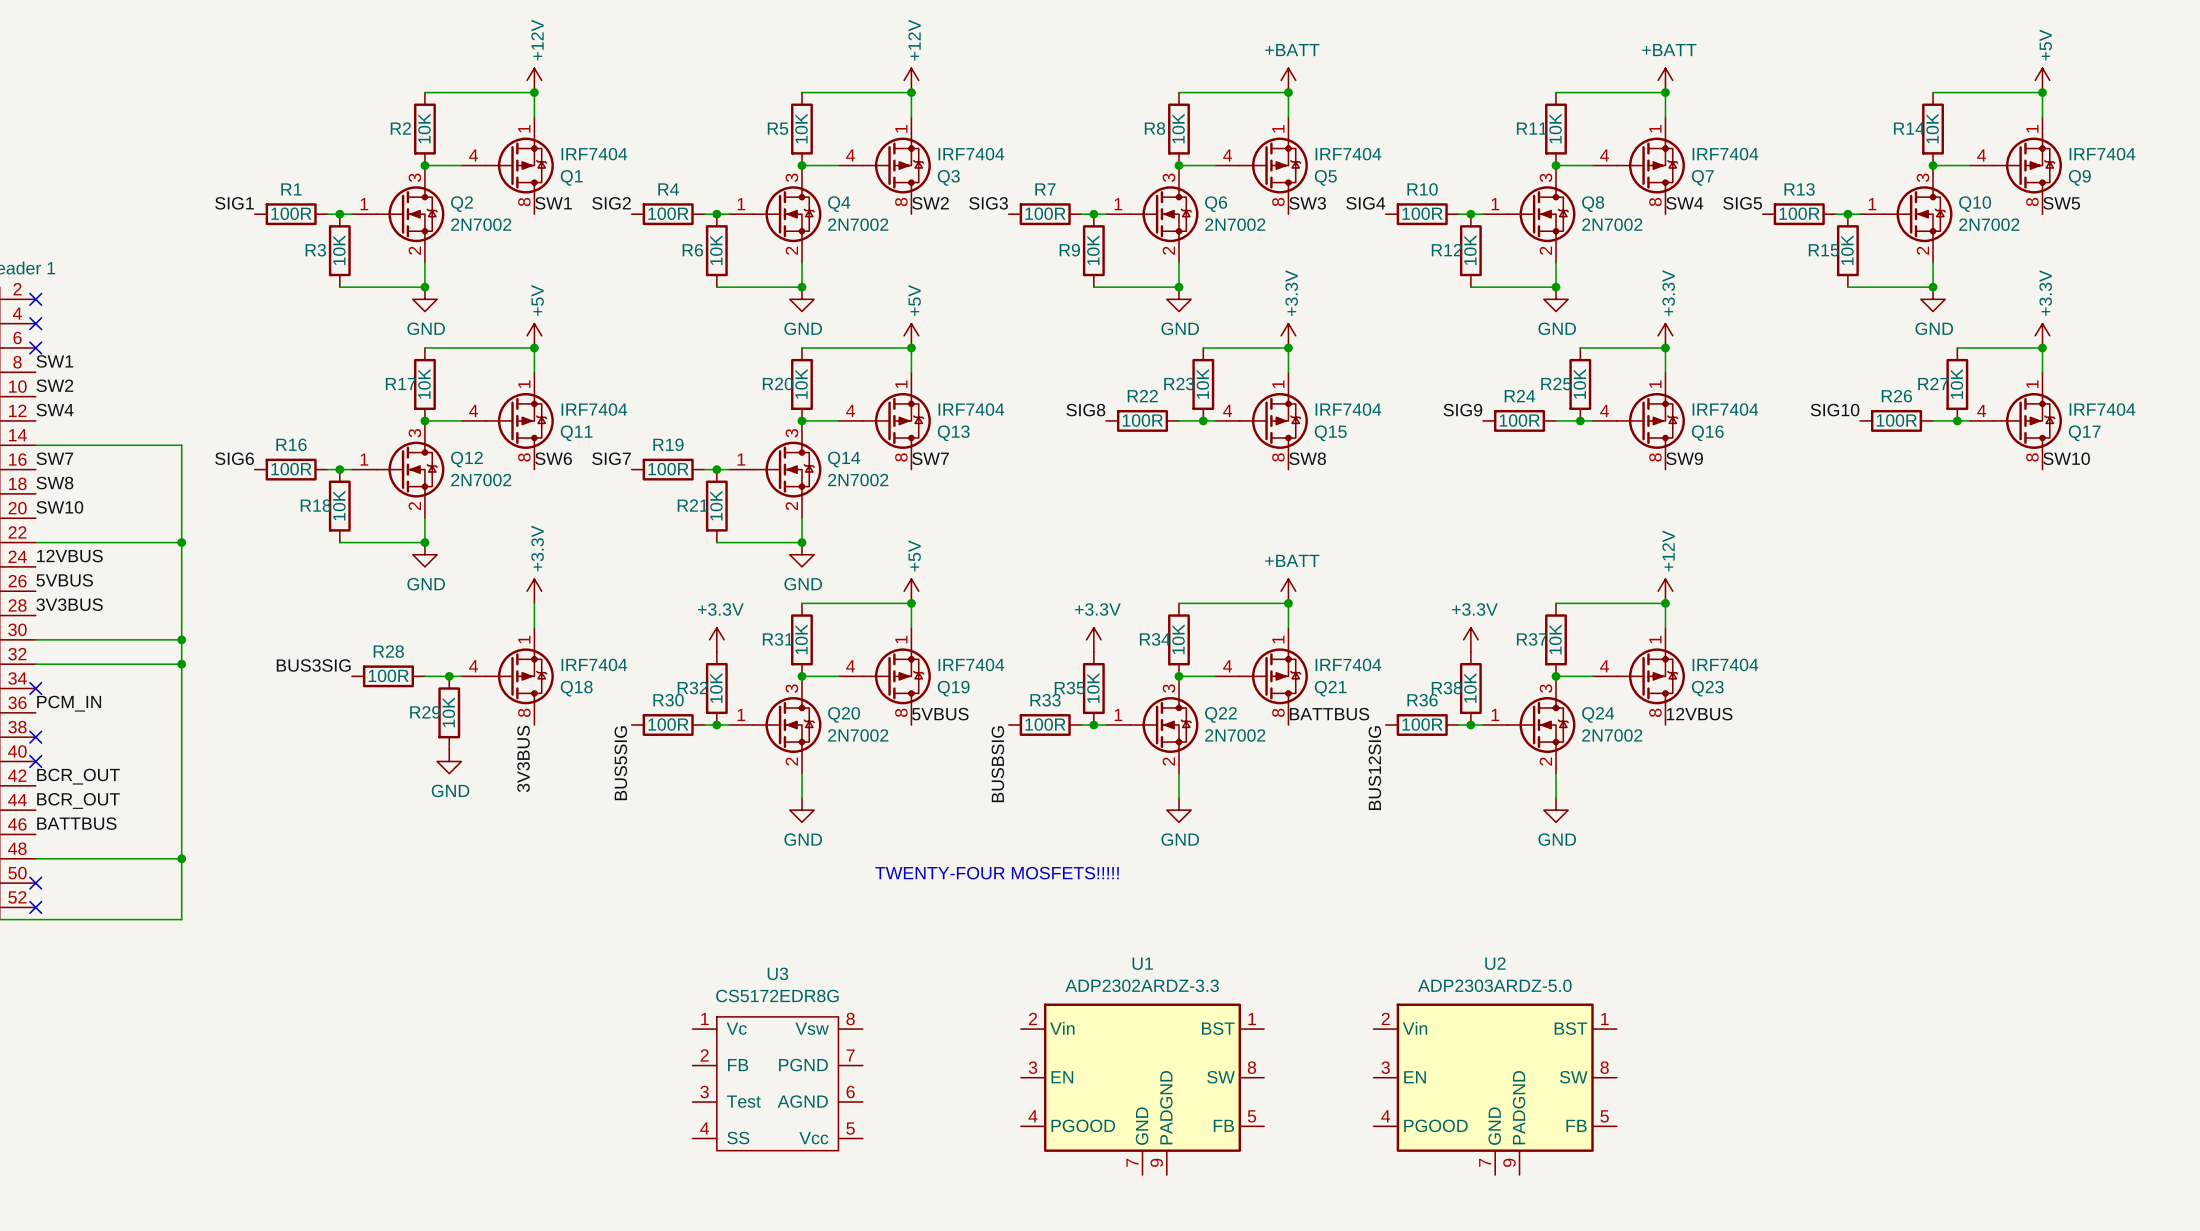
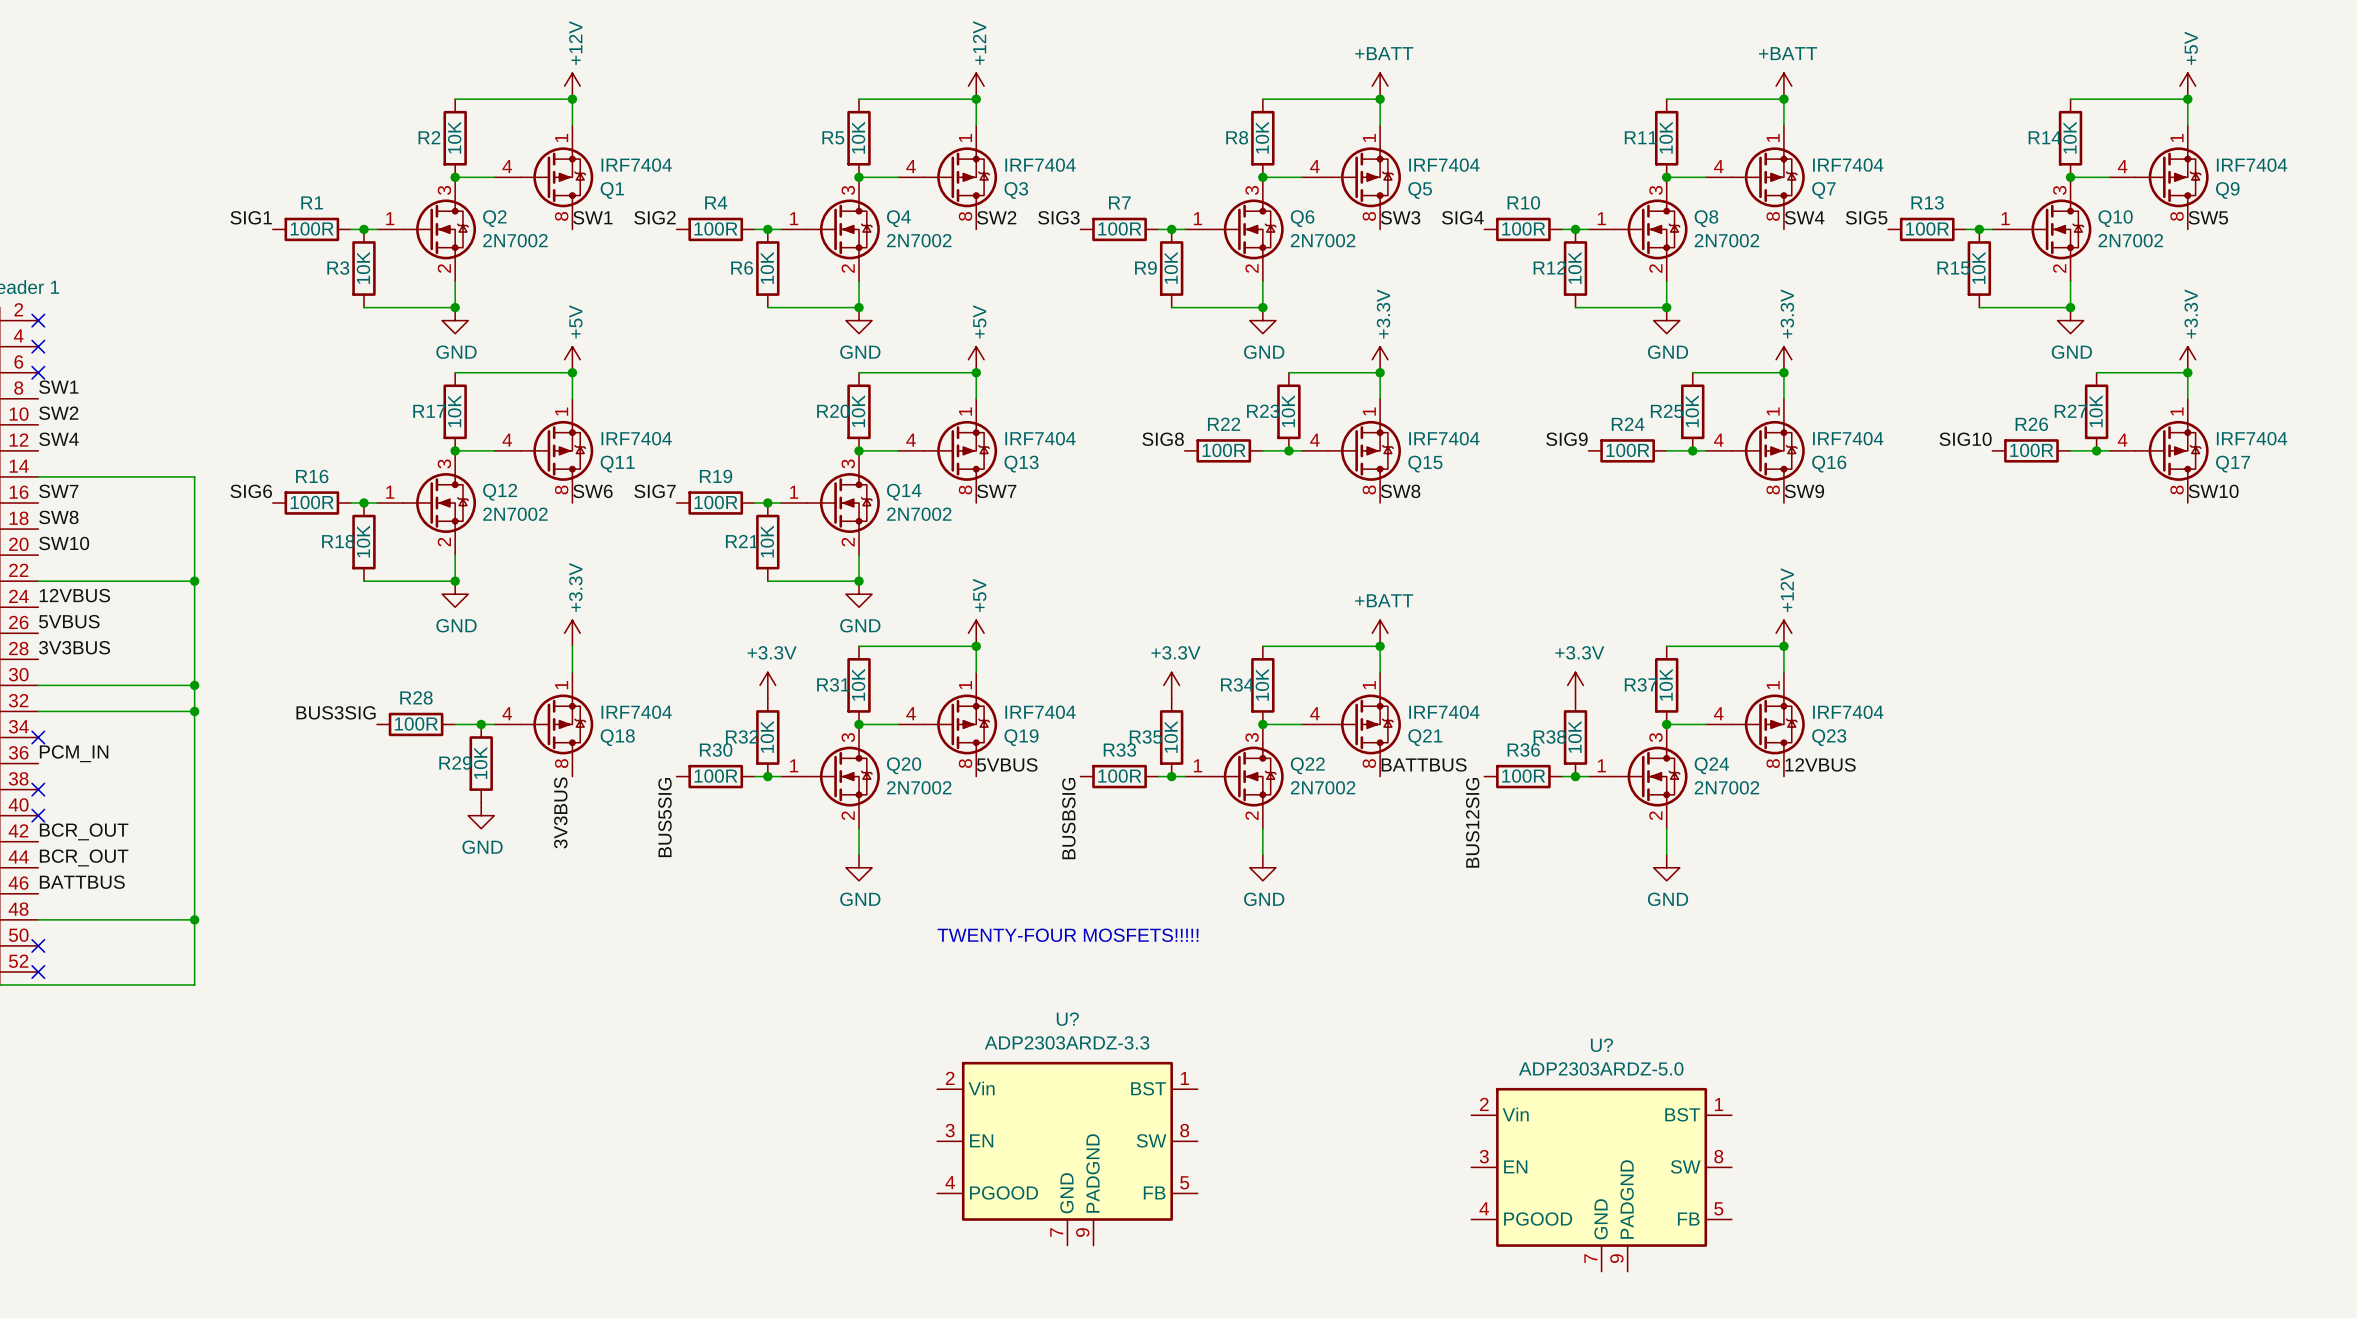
U?: none -> ADP2303ARDZ-3.3 (1067, 1153)
U3: CS5172EDR8G (777, 1083) -> none
U1: ADP2302ARDZ-3.3 (1142, 1089) -> none
U2: ADP2303ARDZ-5.0 (1495, 1089) -> none
U?: none -> ADP2303ARDZ-5.0 (1601, 1179)

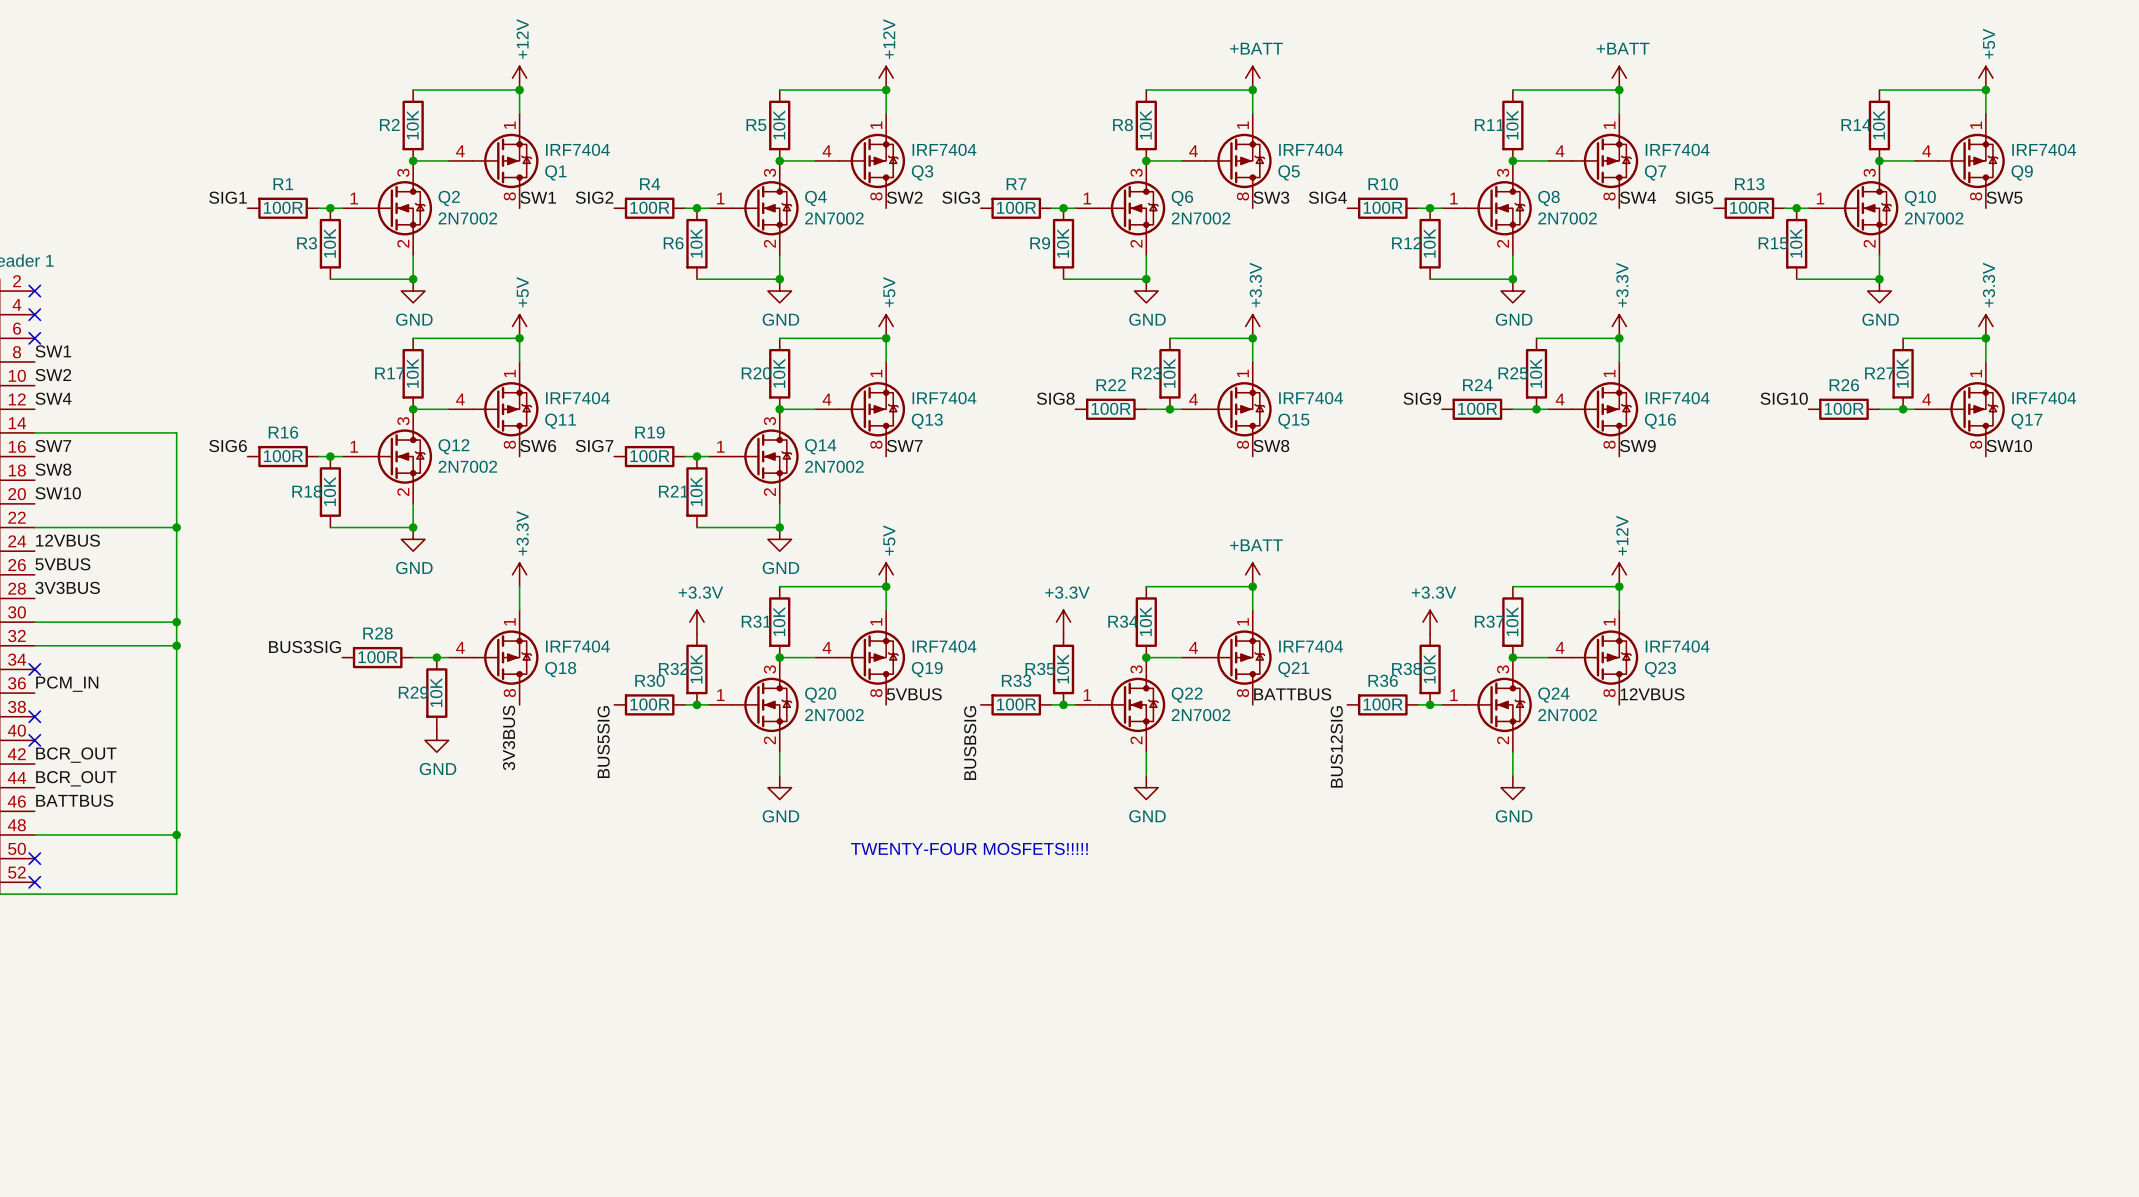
U?: ADP2303ARDZ-3.3 (1067, 1153) -> none
U?: ADP2303ARDZ-5.0 (1601, 1179) -> none

